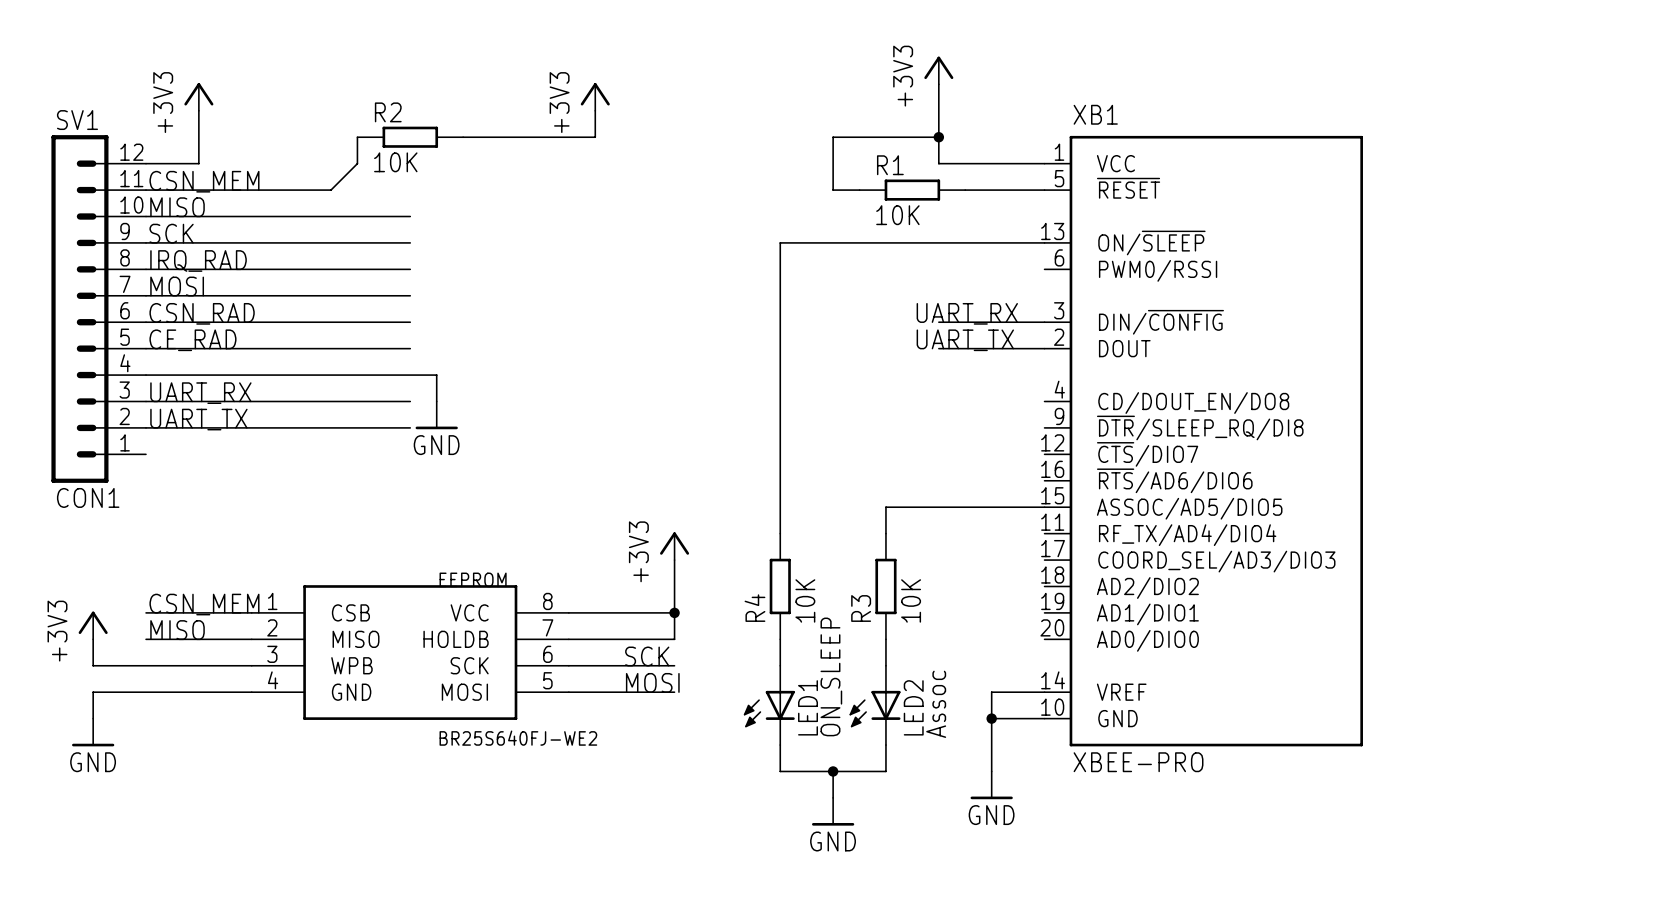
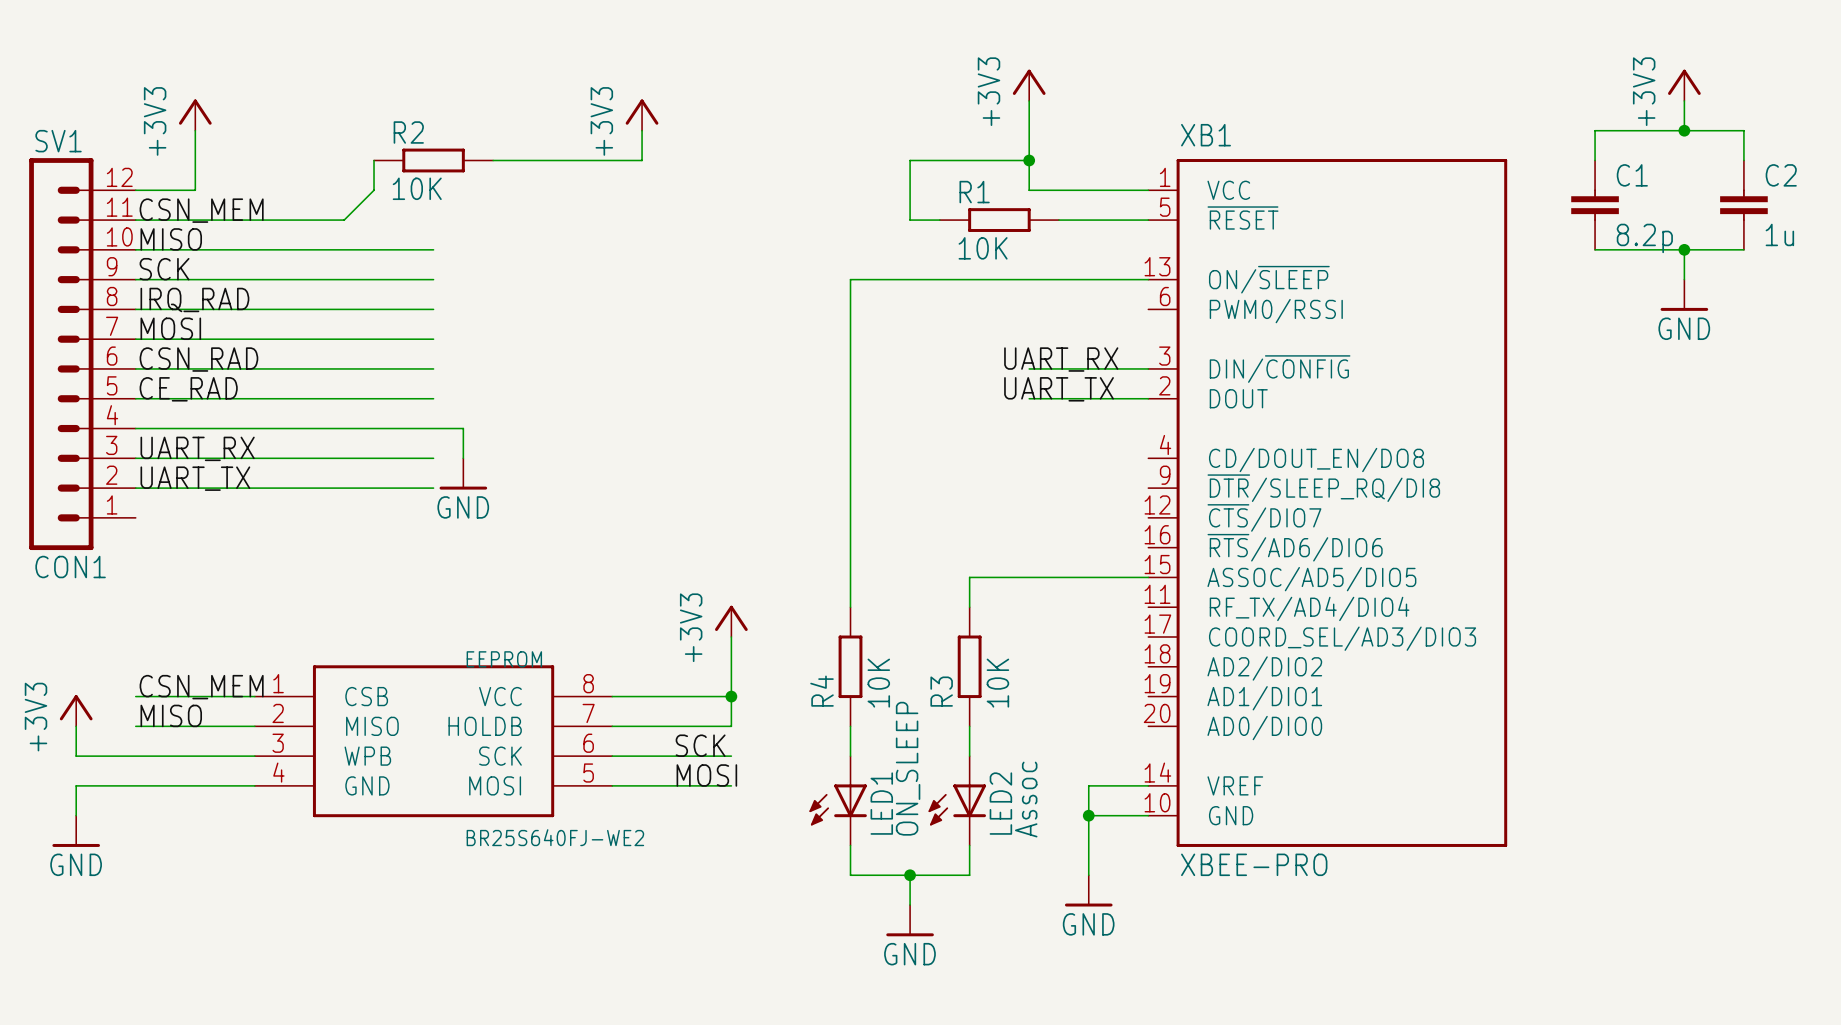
power symbol: none -> +3V3 (1684, 85)
wire: none -> (1684, 100) (1684, 130)
junction: none -> (1684, 130)
wire: none -> (1595, 160) (1595, 130) (1743, 130) (1743, 160)
C1: none -> 8.2p (1595, 205)
C2: none -> 1u (1743, 205)
wire: none -> (1595, 249) (1743, 249)
wire: none -> (1684, 249) (1684, 279)
junction: none -> (1684, 249)
power symbol: none -> GND (1684, 295)

